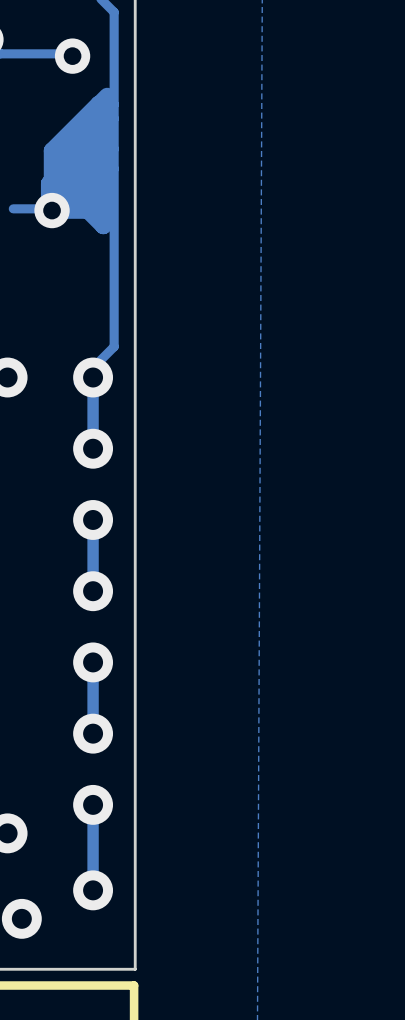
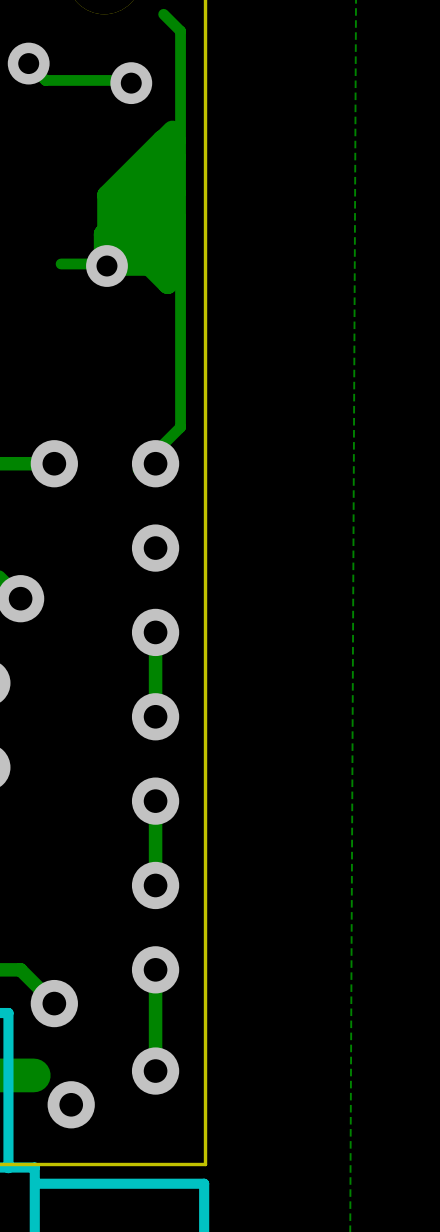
track: (93, 377) (93, 448) -> none

